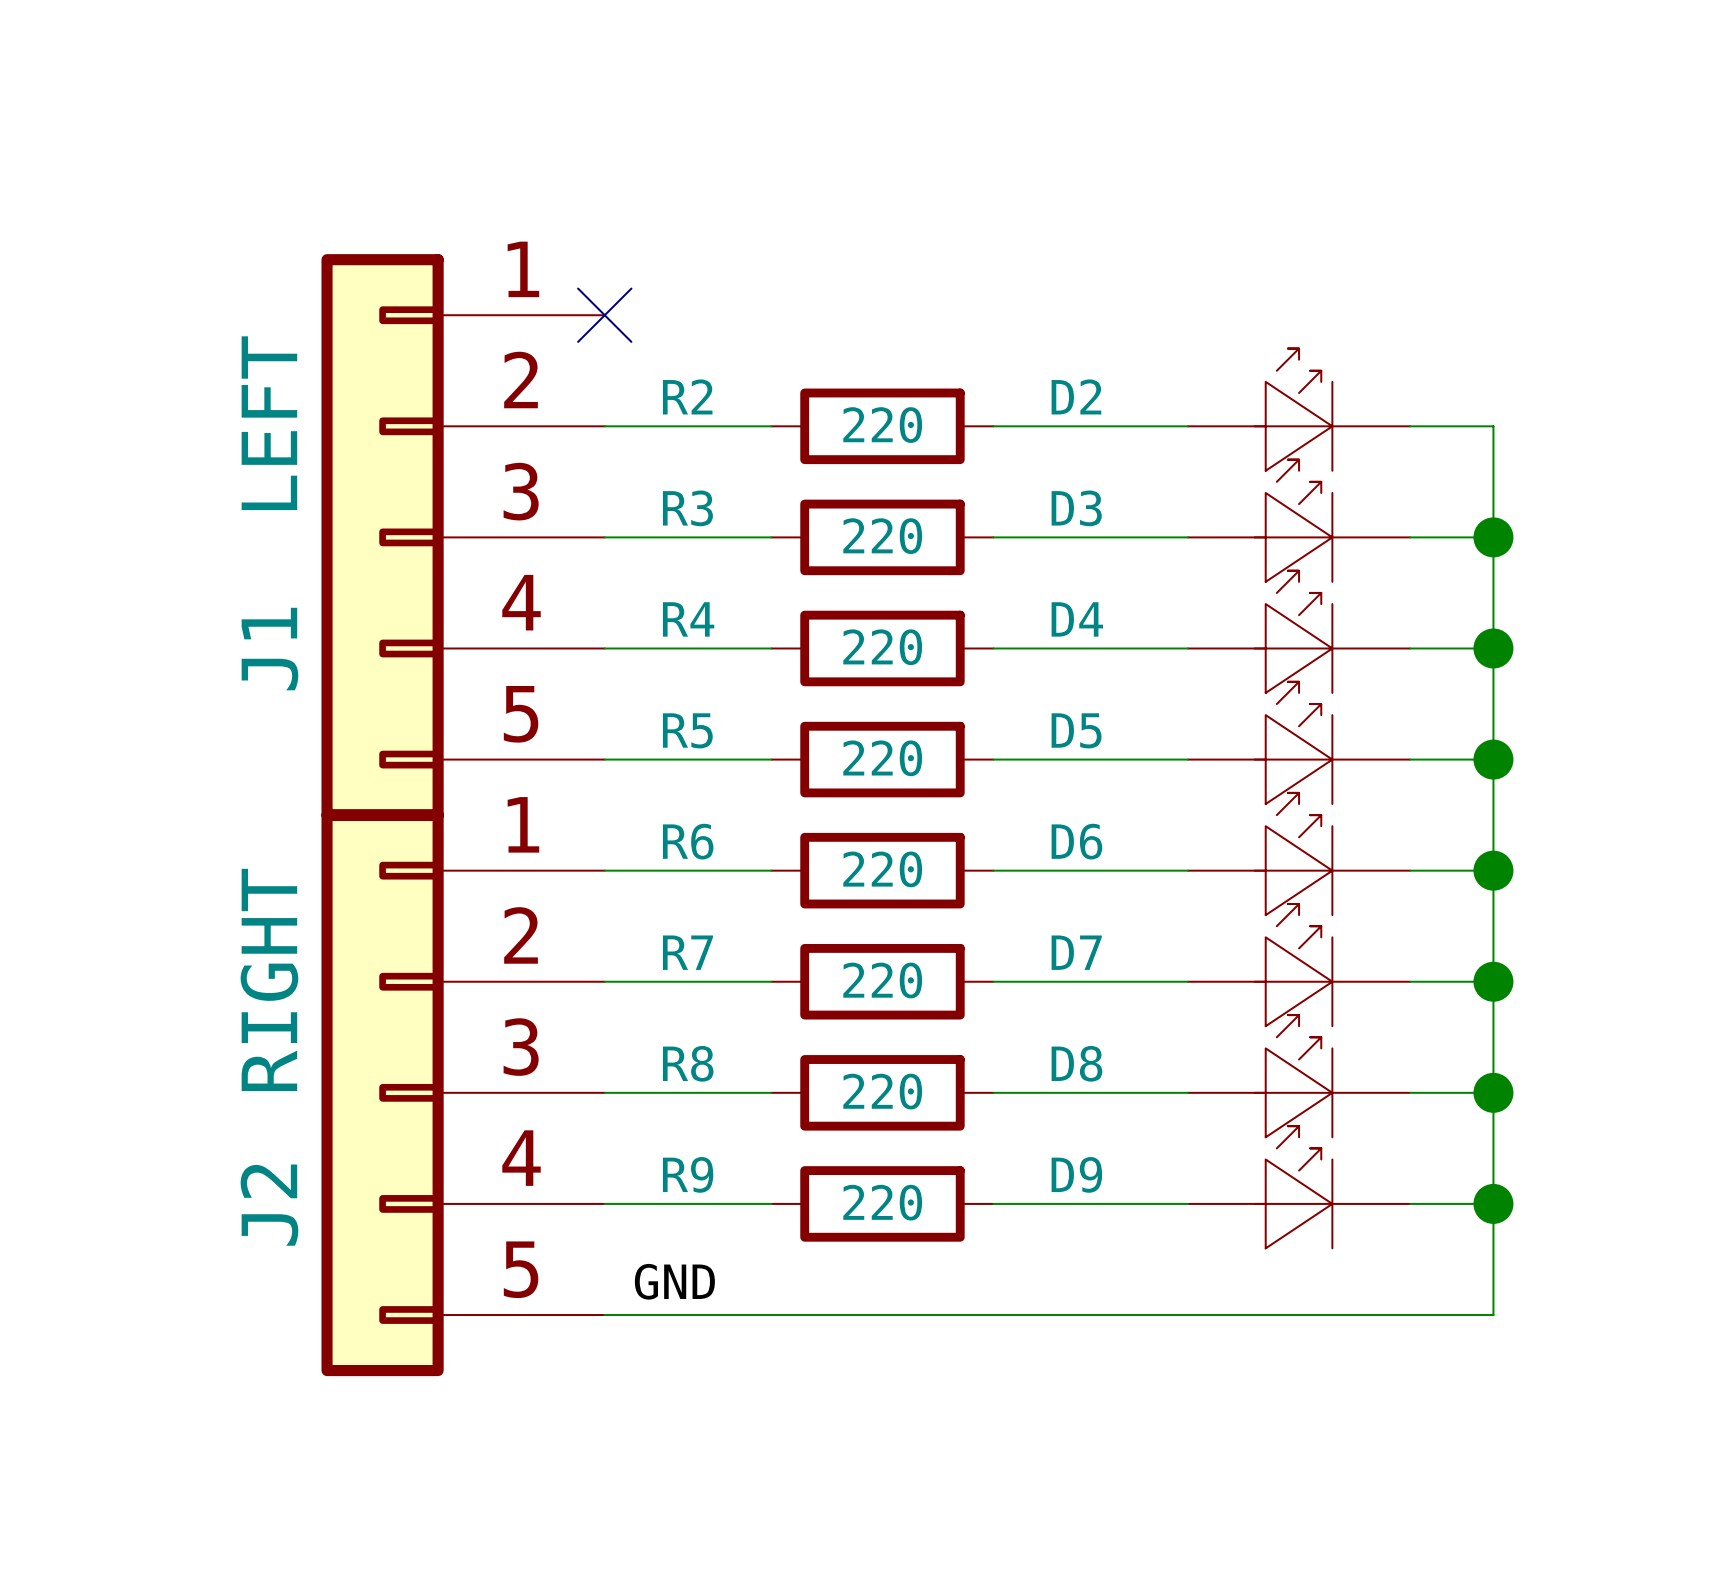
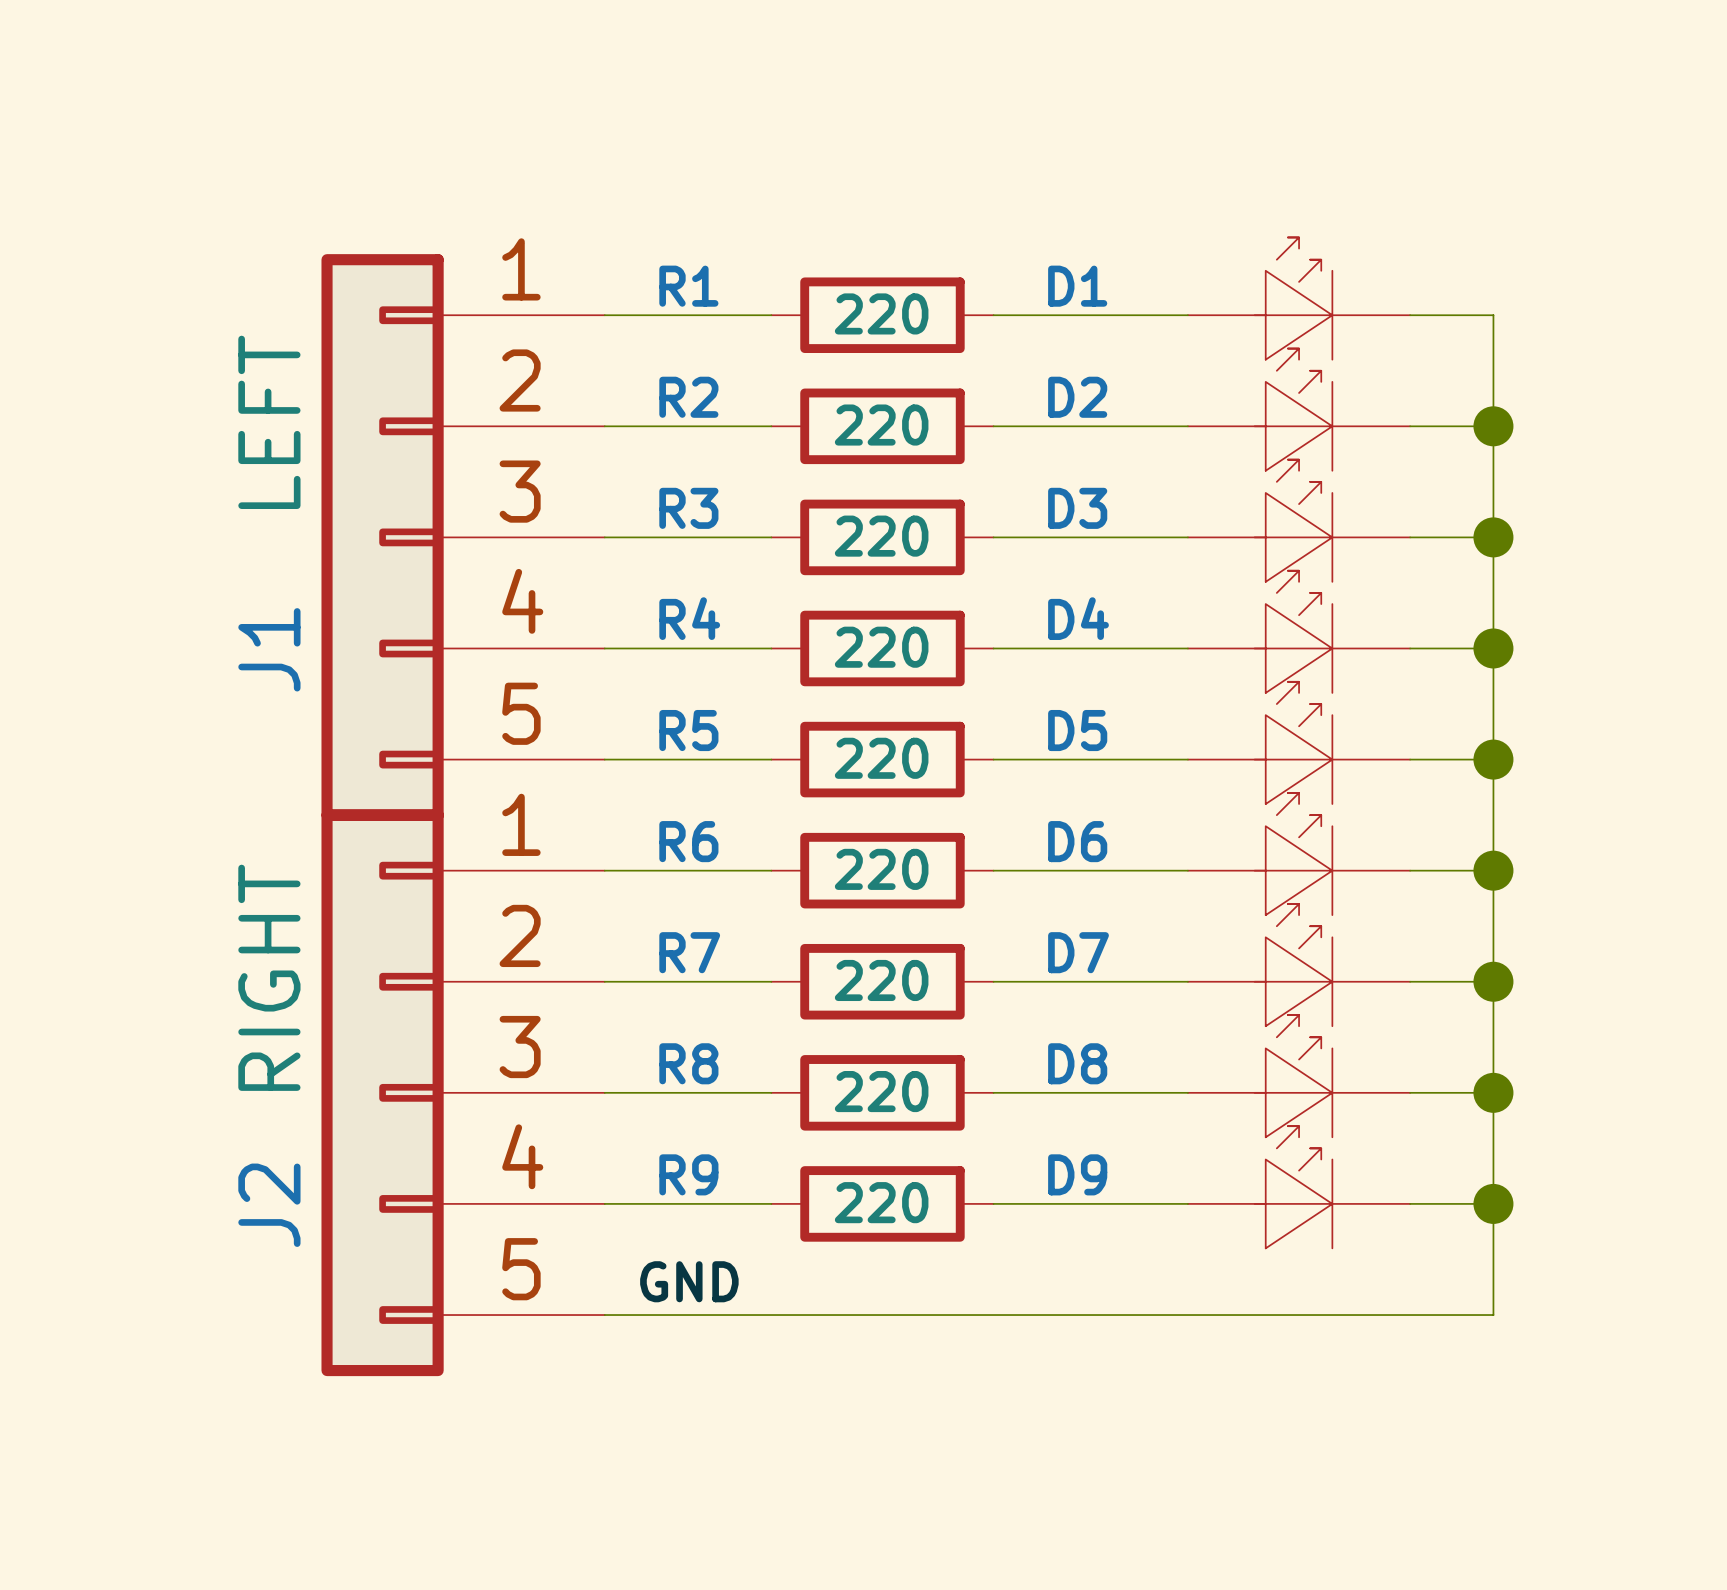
D1: none -> (1299, 298)
wire: none -> (604, 315) (771, 315)
no-connect mark: (604, 315) -> none
R1: none -> 220 (882, 315)
wire: none -> (993, 315) (1187, 315)
wire: none -> (1410, 315) (1493, 315) (1493, 426)
junction: none -> (1493, 426)

